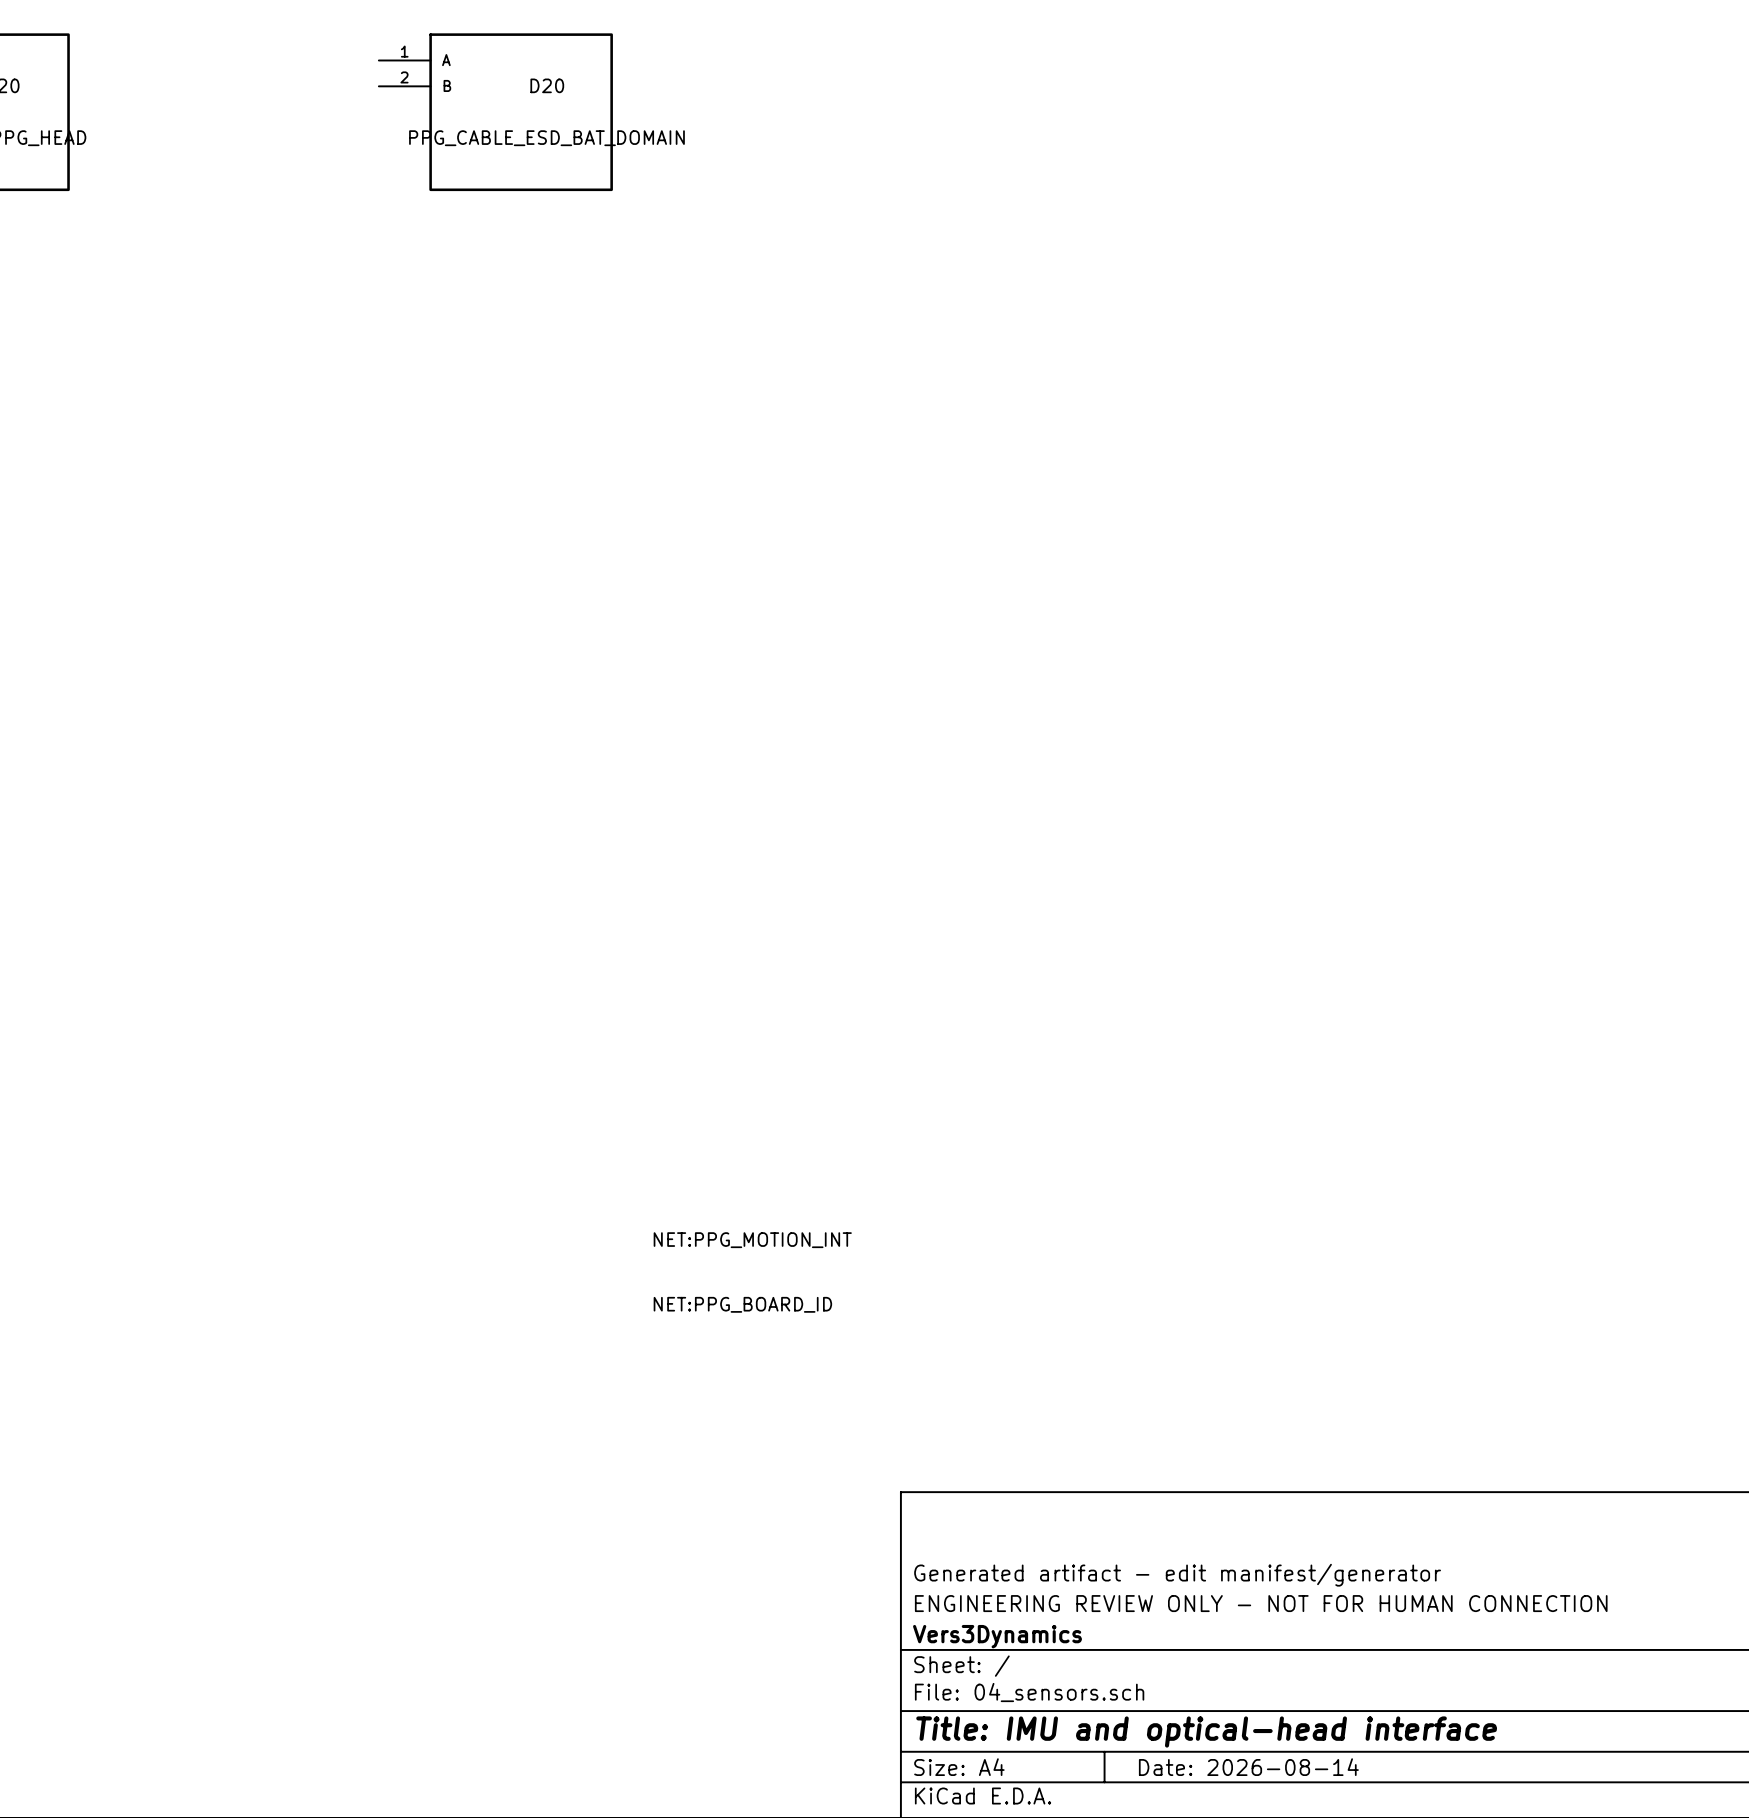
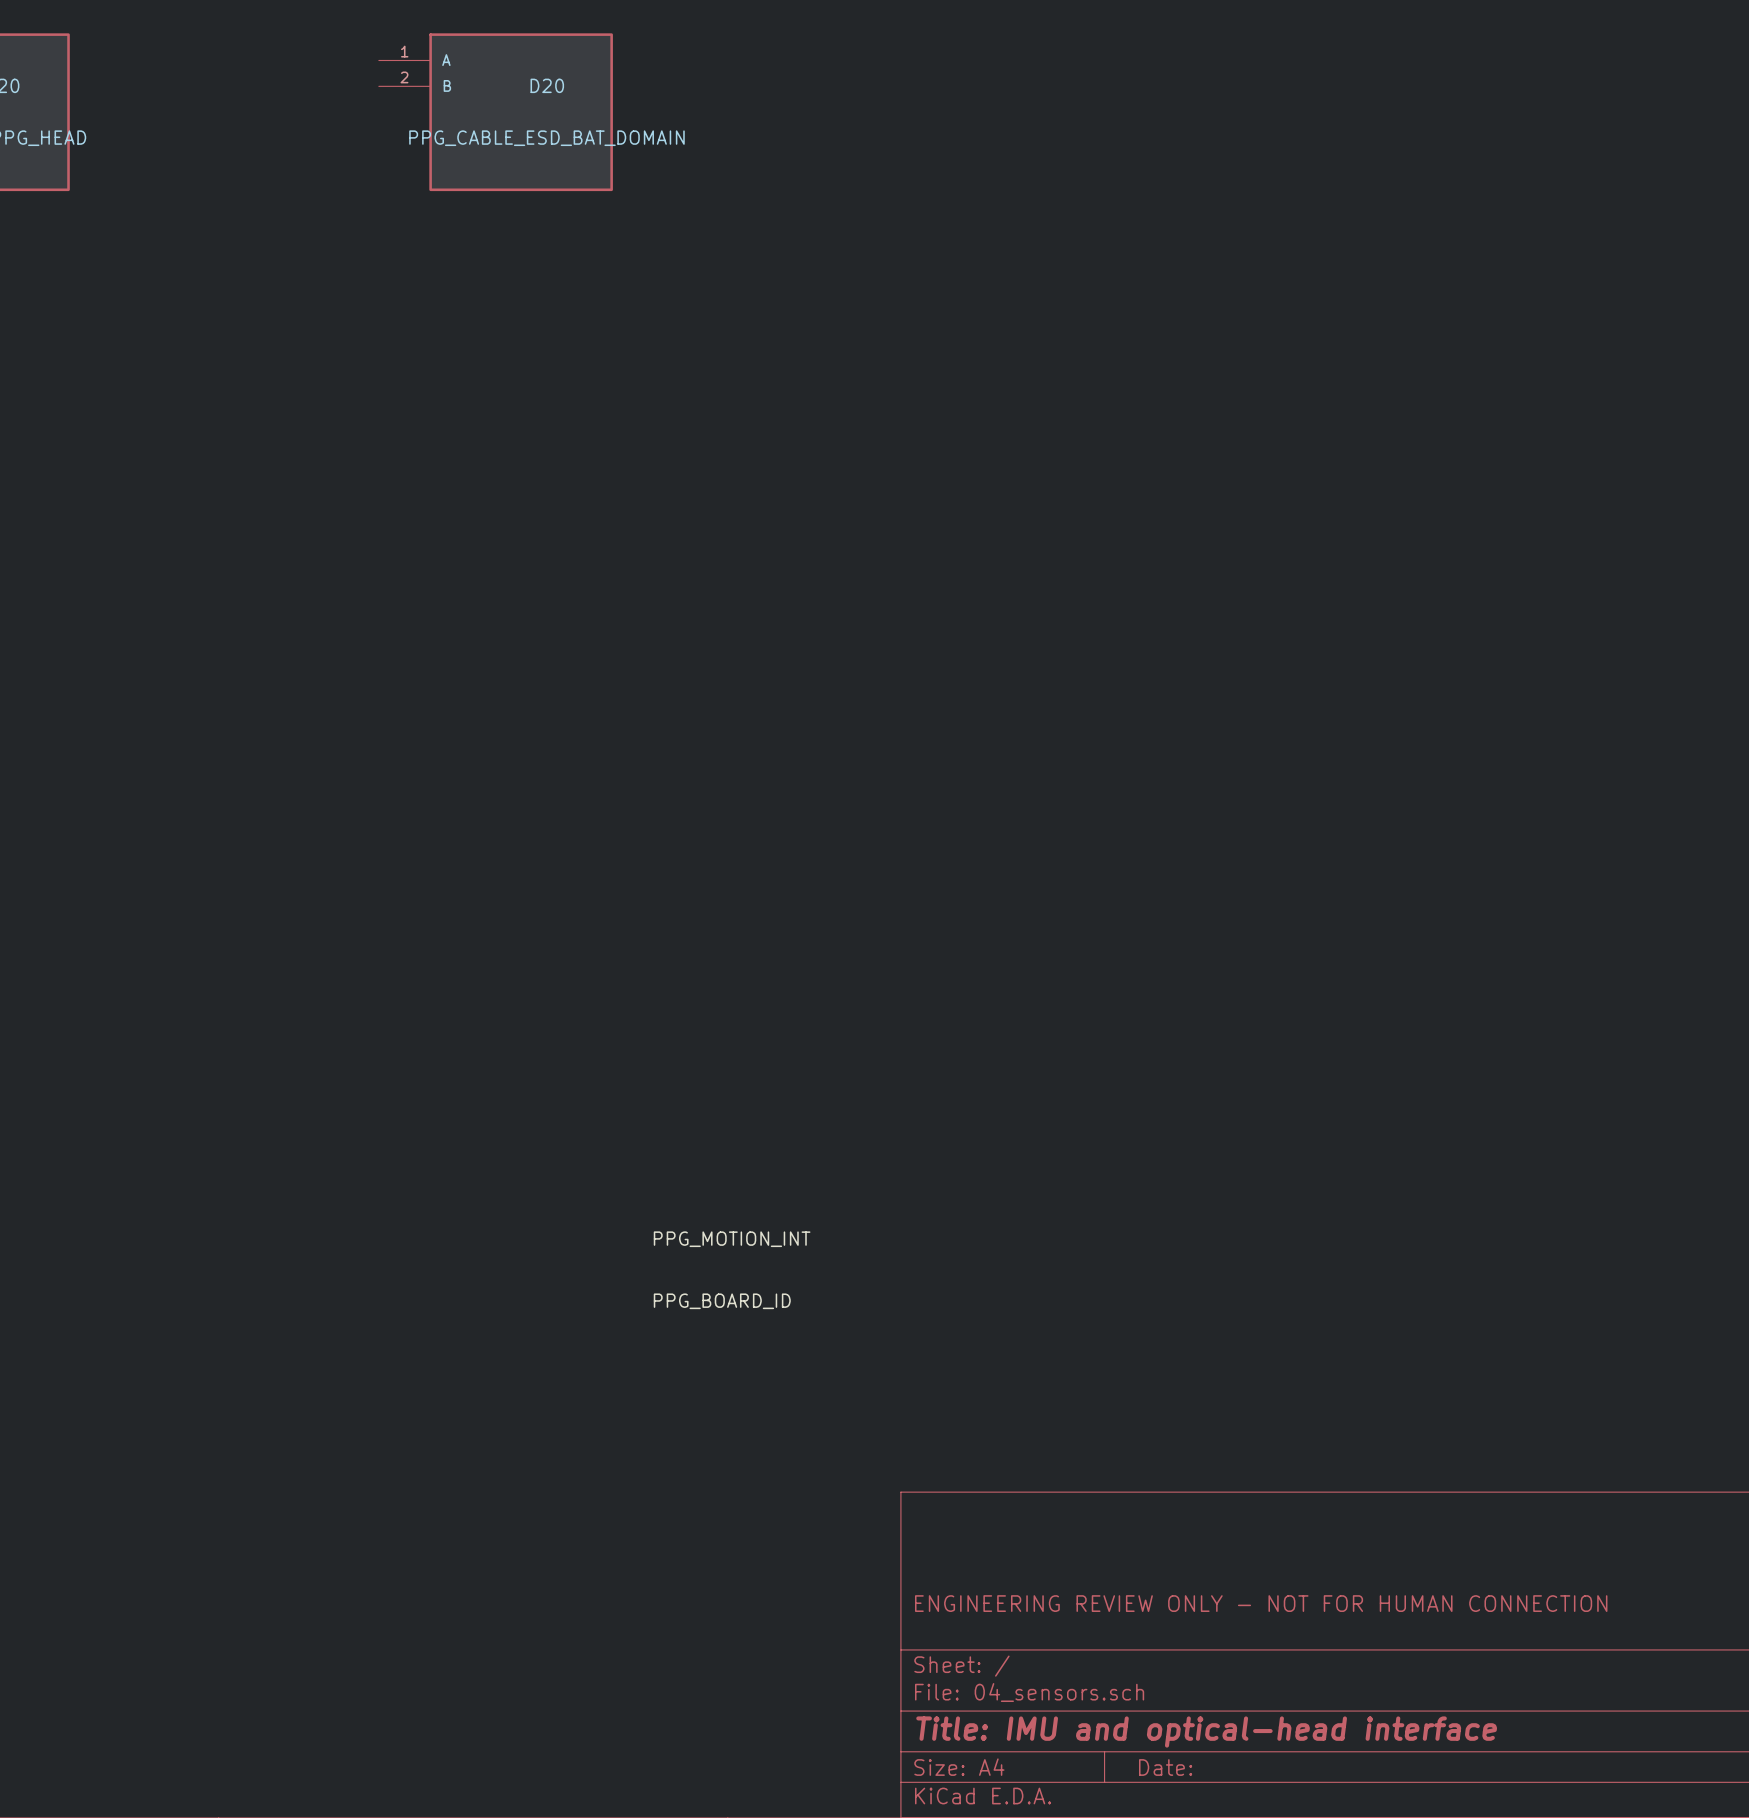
label: none -> PPG_MOTION_INT (732, 1239)
text: NET:PPG_MOTION_INT (752, 1240) -> none
label: none -> PPG_BOARD_ID (722, 1301)
text: NET:PPG_BOARD_ID (742, 1304) -> none
title block: Generated artifact - edit manifest/generator (1177, 1575) -> none
title block: Vers3Dynamics (997, 1636) -> none
title block: Date: 2026-08-14 (1248, 1767) -> Date: (1165, 1767)

